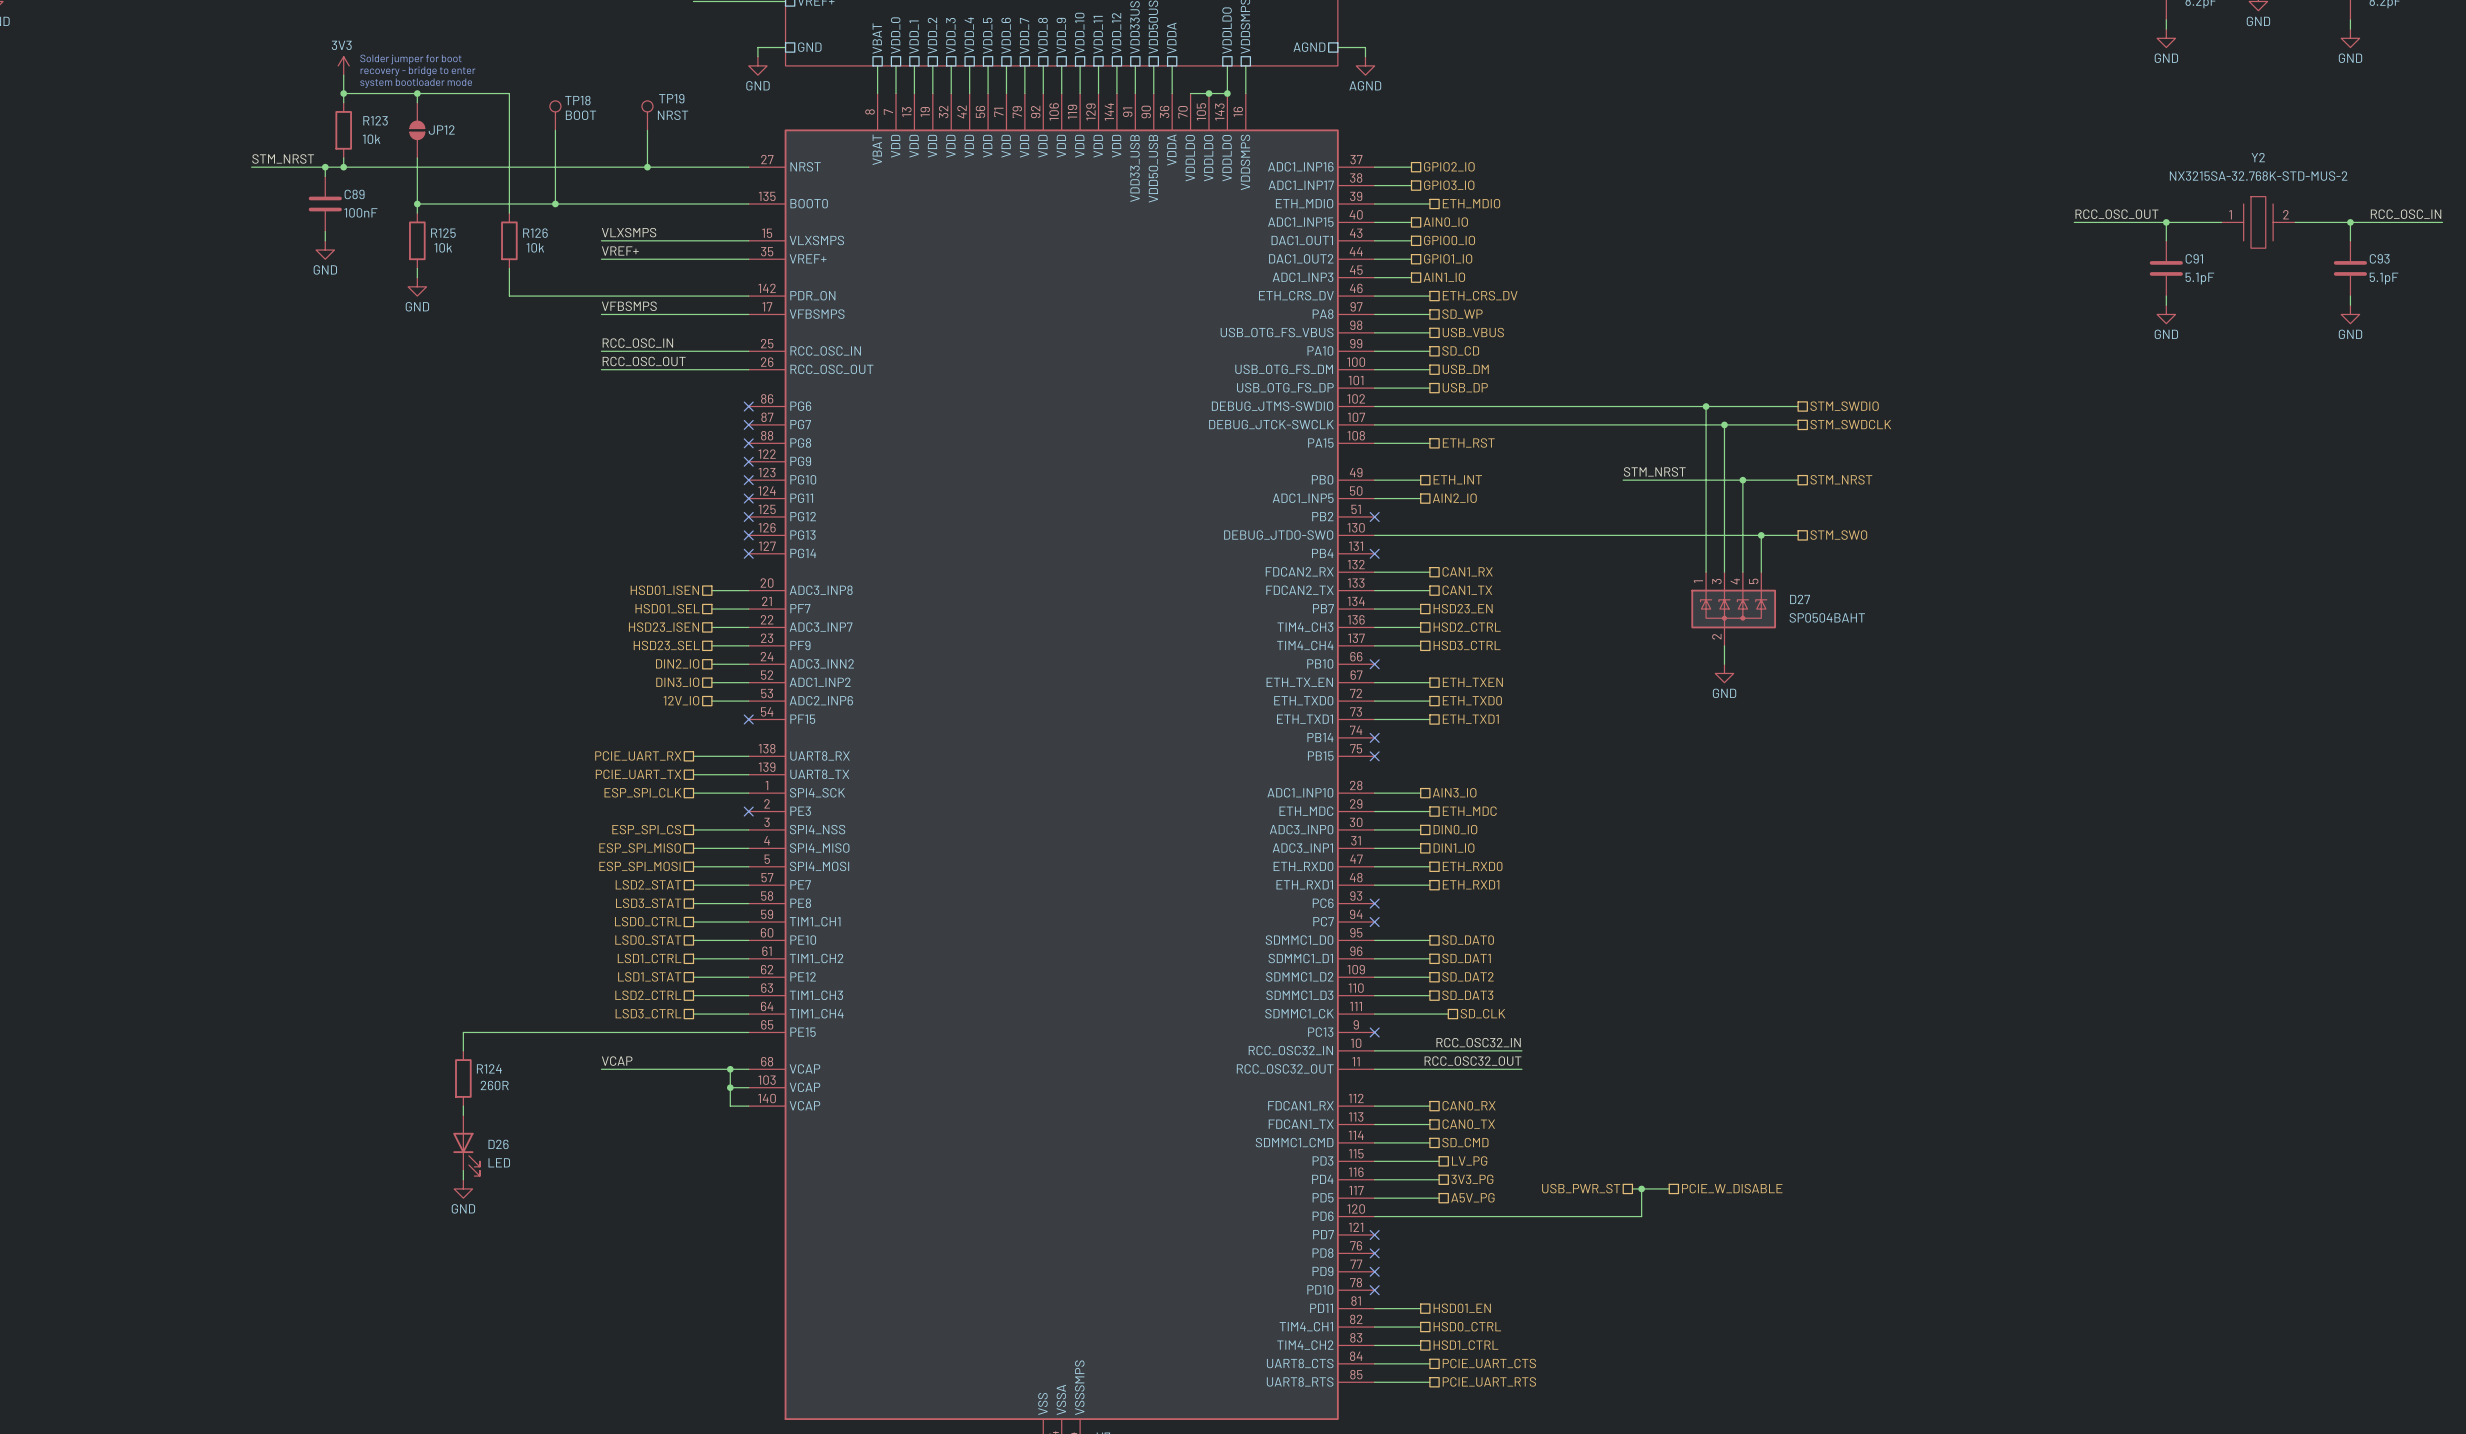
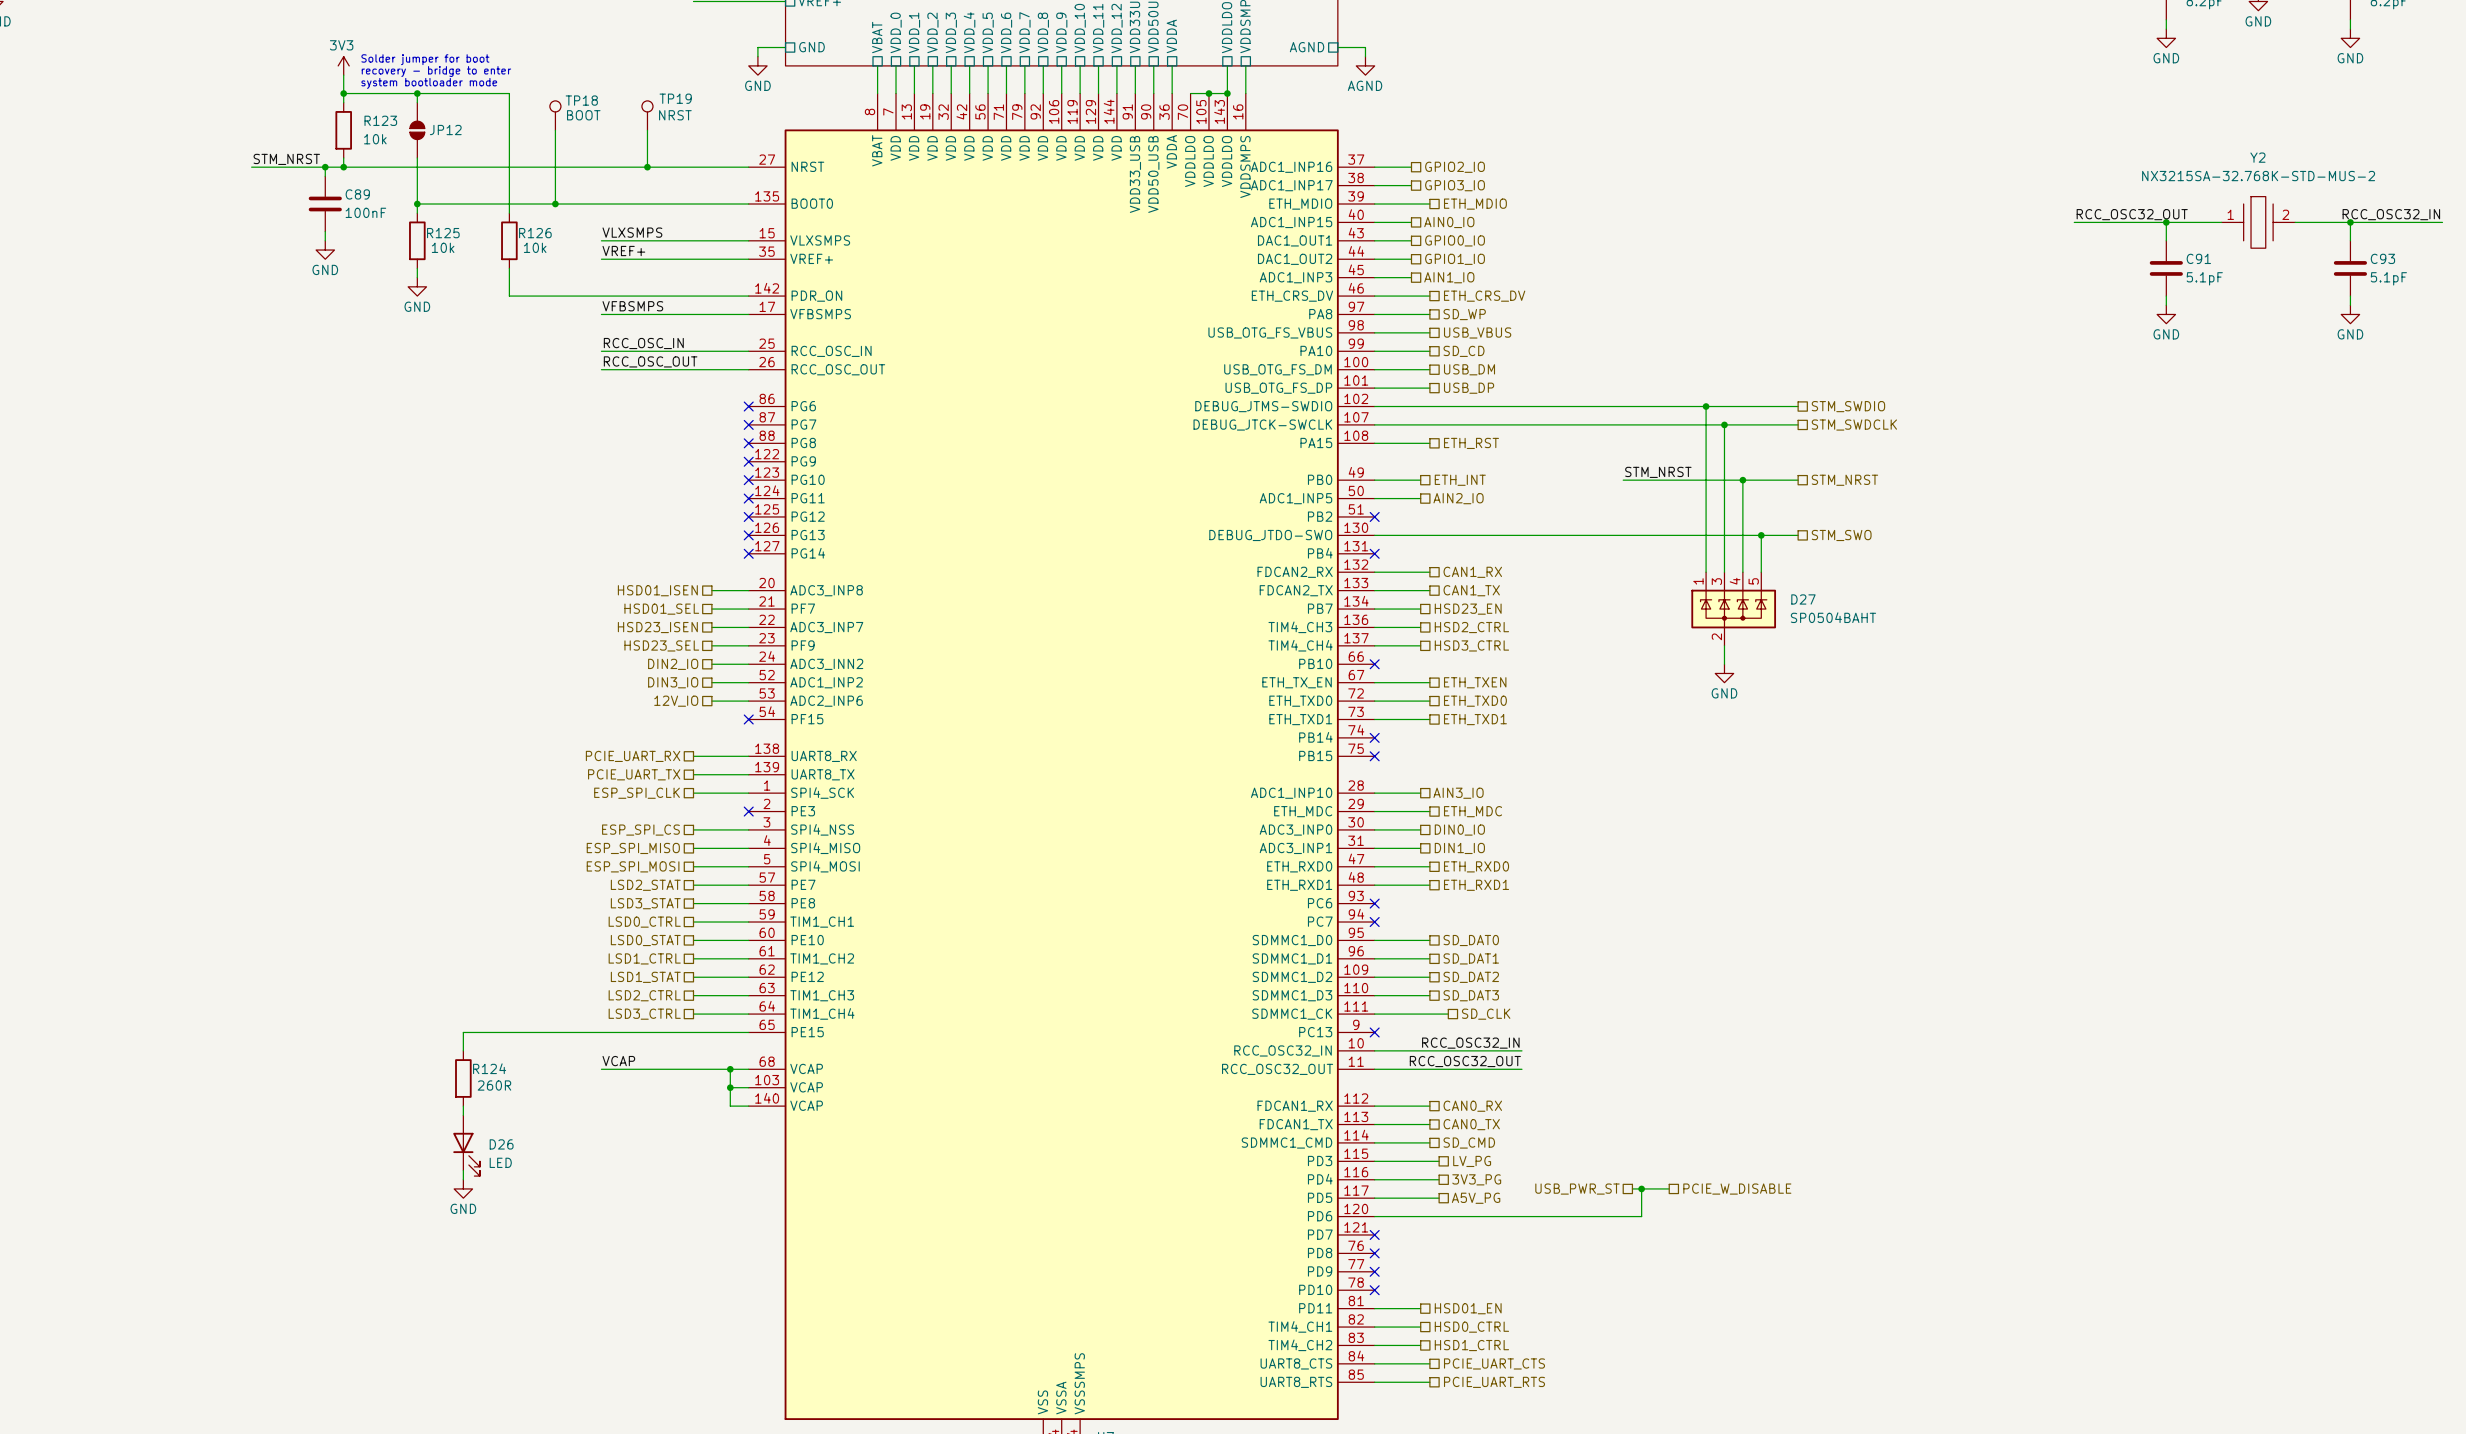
label: RCC_OSC_OUT (2116, 214) -> RCC_OSC32_OUT (2132, 214)
label: RCC_OSC_IN (2406, 214) -> RCC_OSC32_IN (2391, 214)

